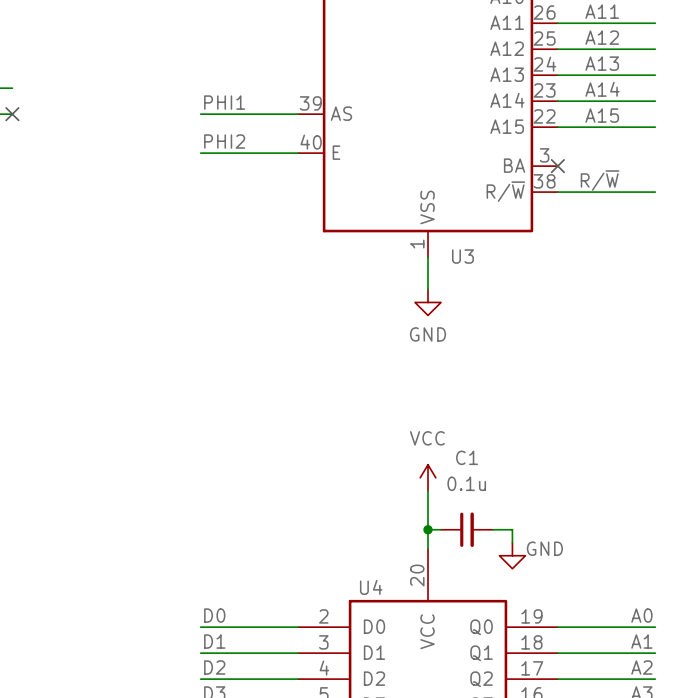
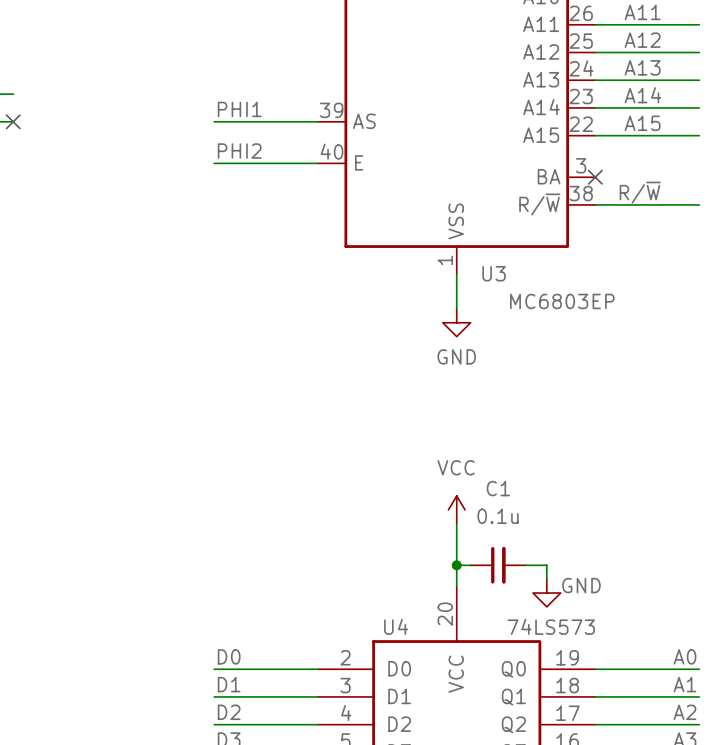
U3 value: none -> MC6803EP (562, 301)
U4 value: none -> 74LS573 (551, 626)

